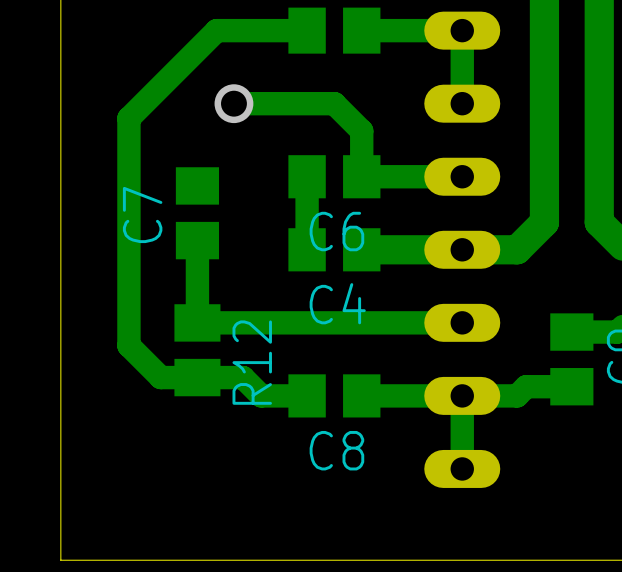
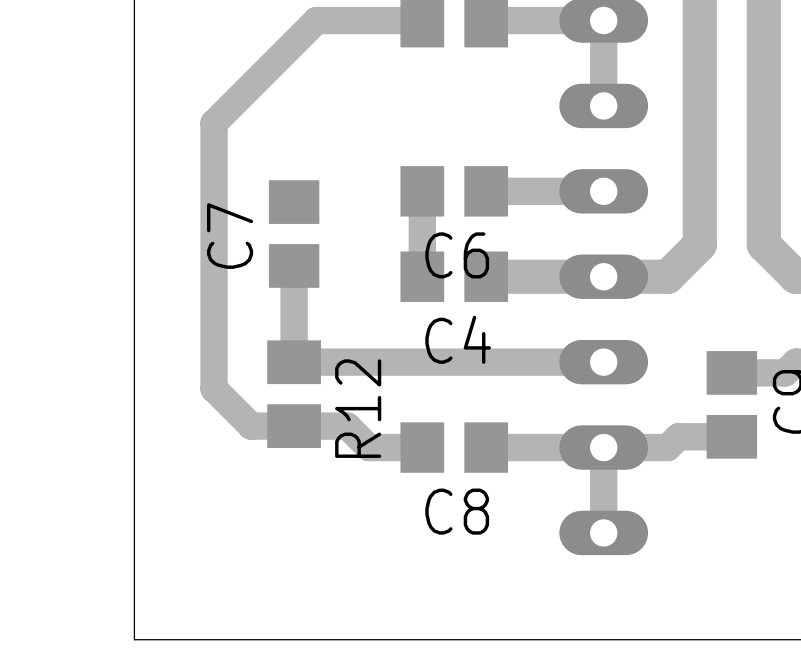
track: (233, 103) (334, 103) (361, 131) (361, 176) -> none
via: (233, 103) -> none

